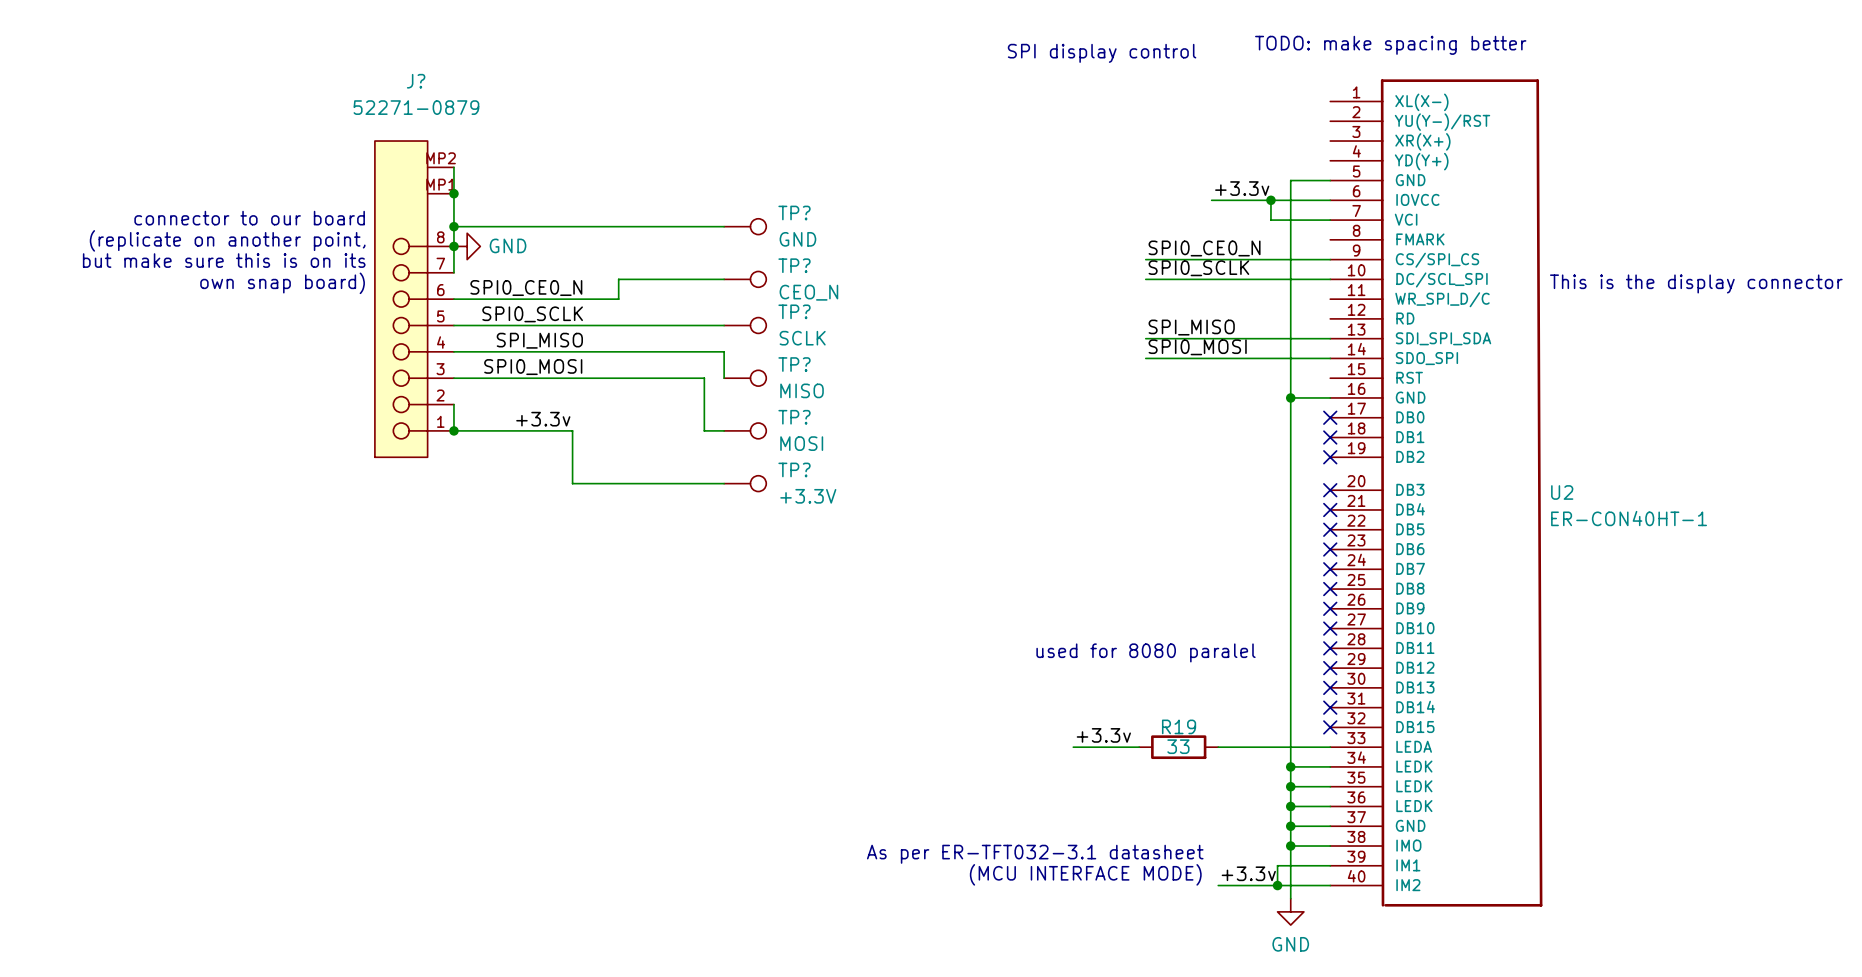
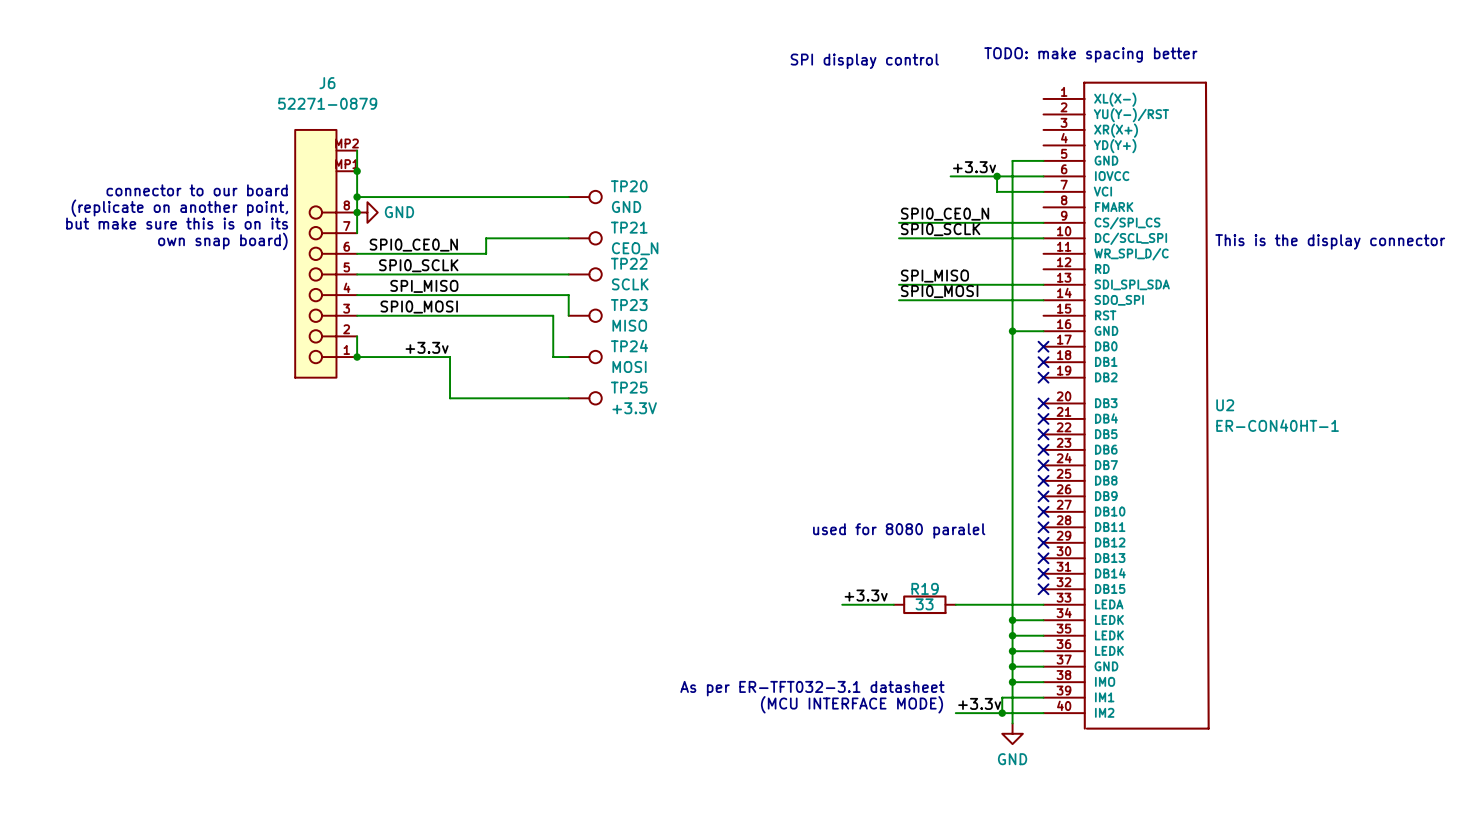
J? name: J? (416, 81) -> J6 (327, 83)
TP? name: TP? (794, 213) -> TP20 (629, 186)
TP? name: TP? (794, 265) -> TP21 (629, 227)
TP? name: TP? (794, 311) -> TP22 (629, 263)
TP? name: TP? (794, 364) -> TP23 (629, 305)
TP? name: TP? (794, 417) -> TP24 (629, 346)
TP? name: TP? (794, 469) -> TP25 (629, 387)

